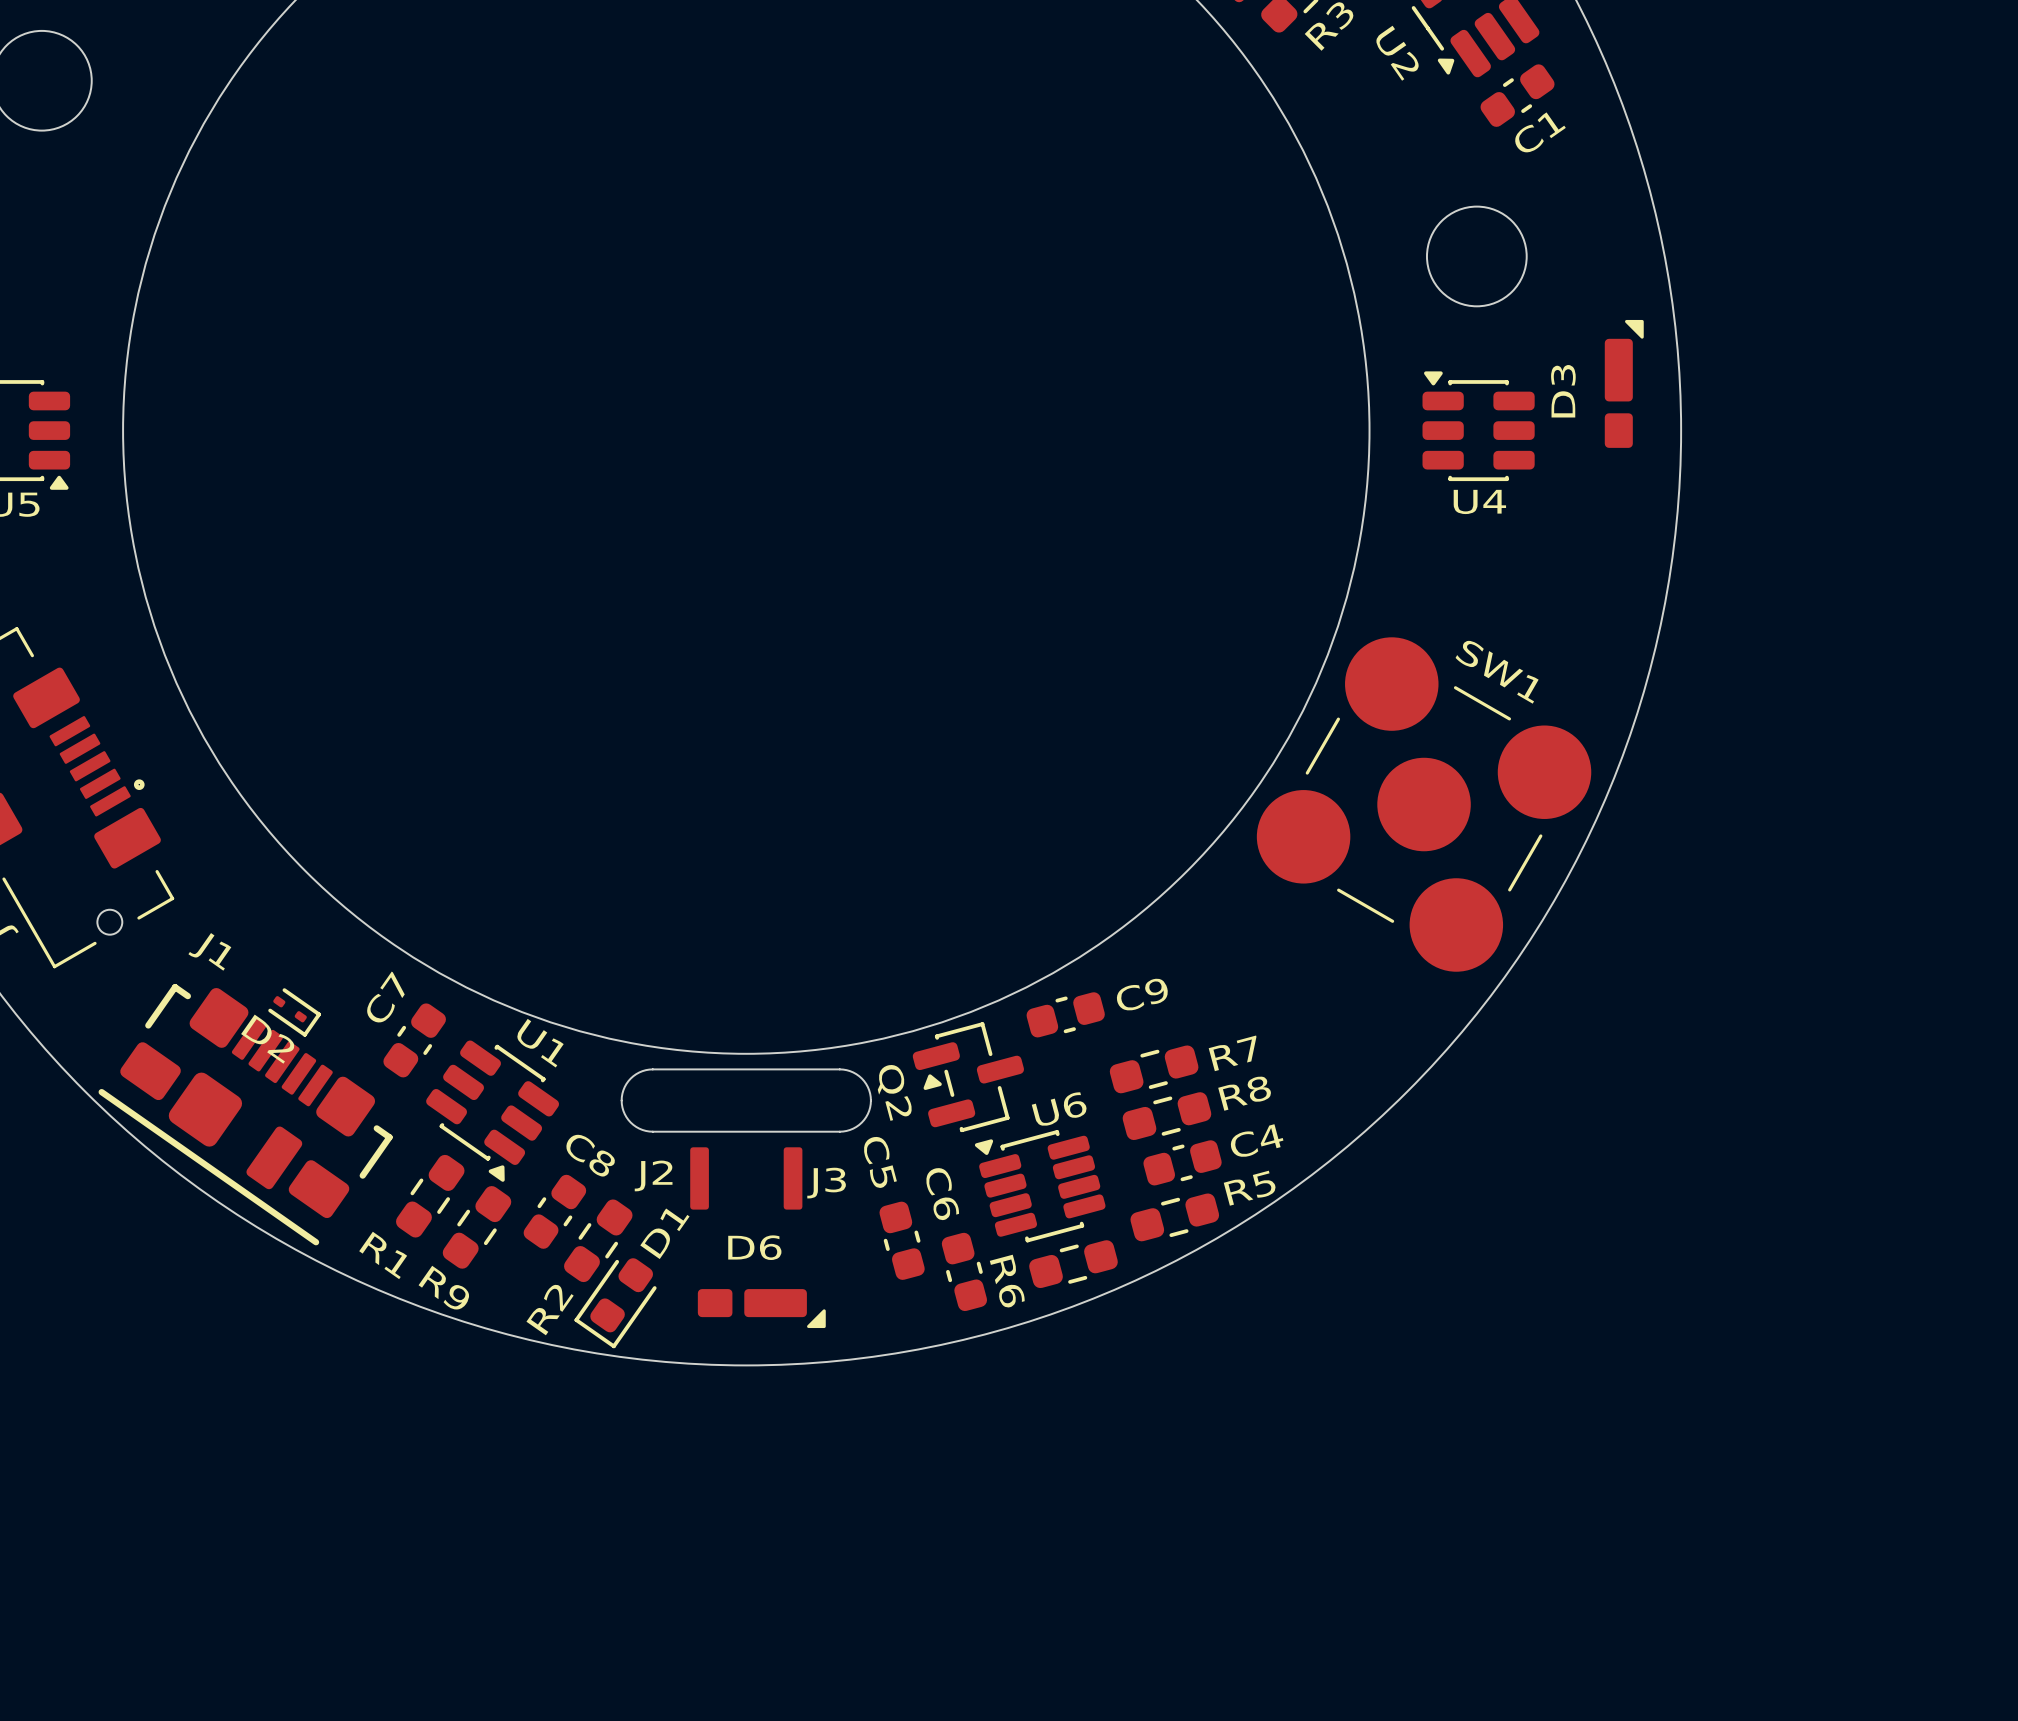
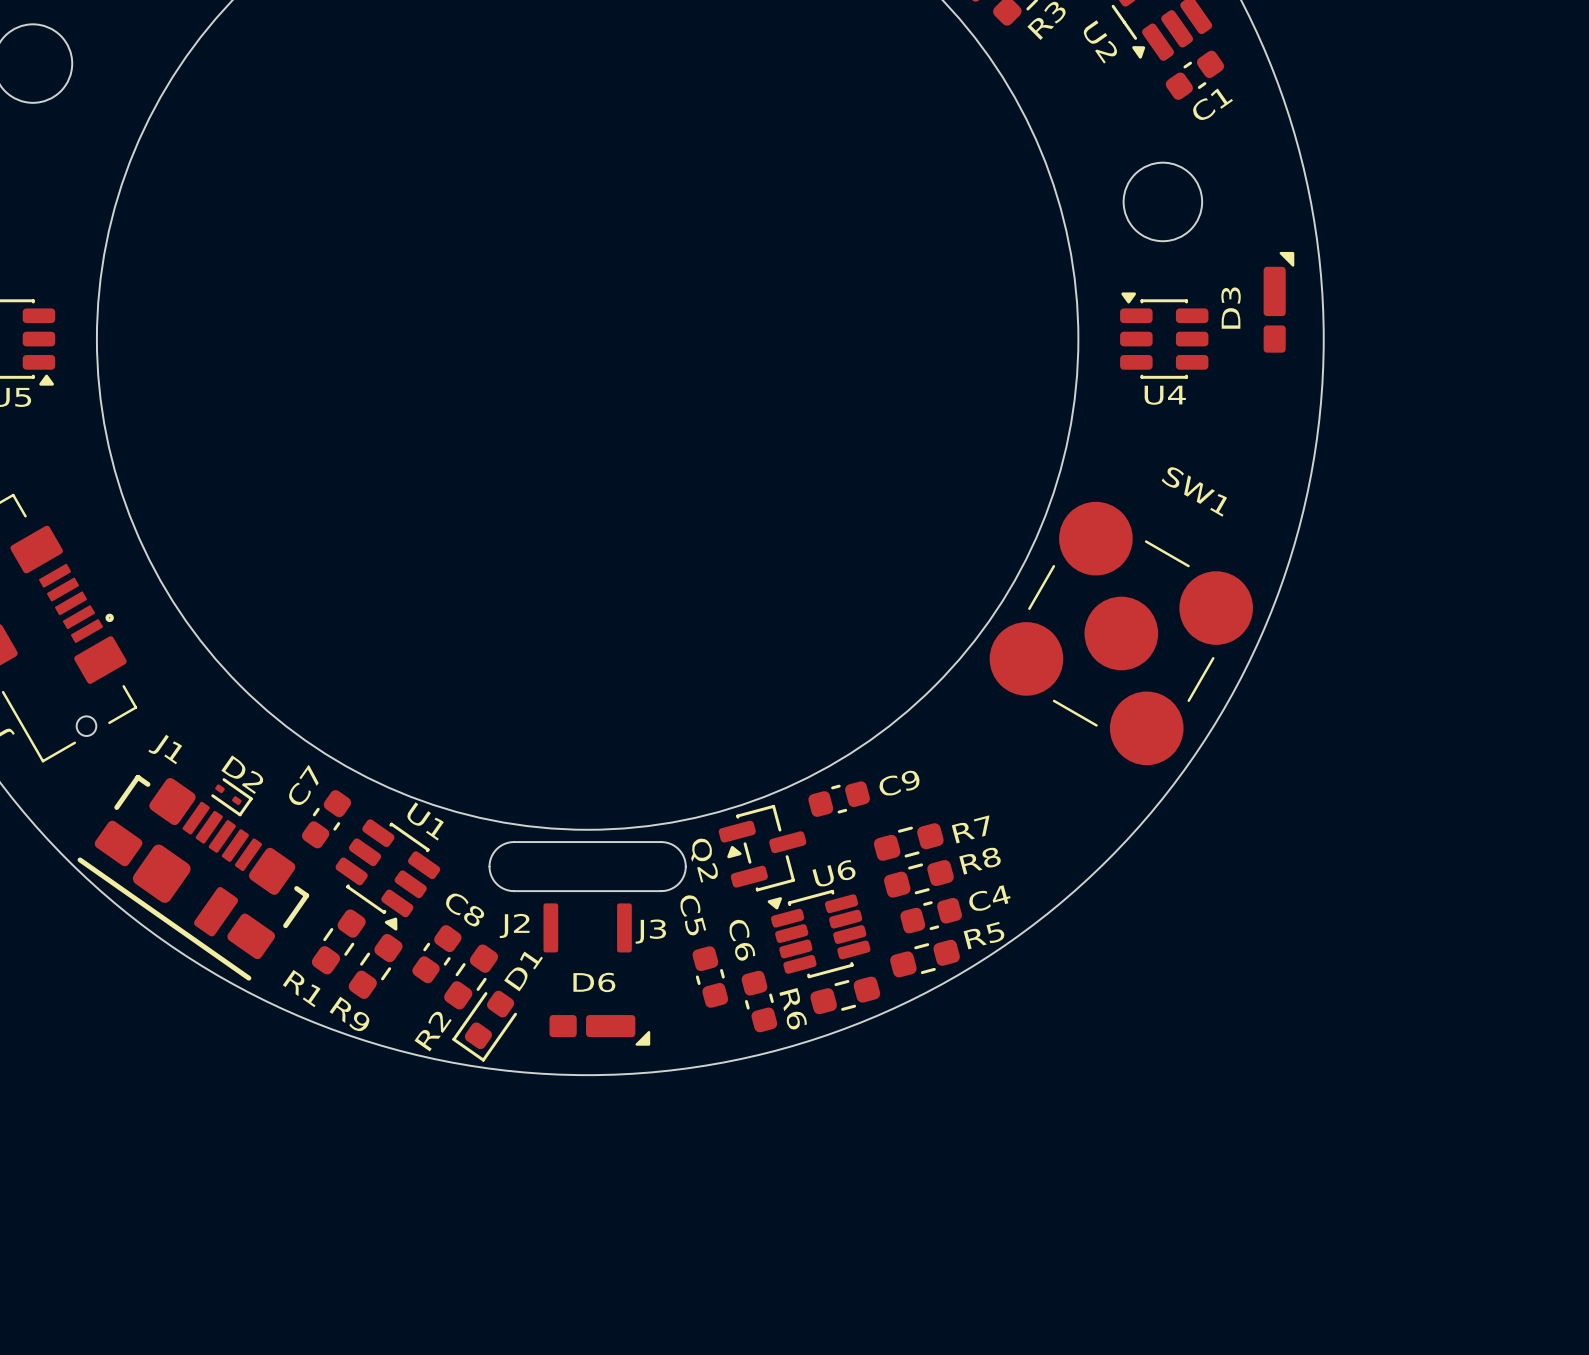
SW1 name position: SW1 (1497, 672) -> SW1 (1194, 491)
D2 name position: D2 (268, 1039) -> D2 (242, 774)

